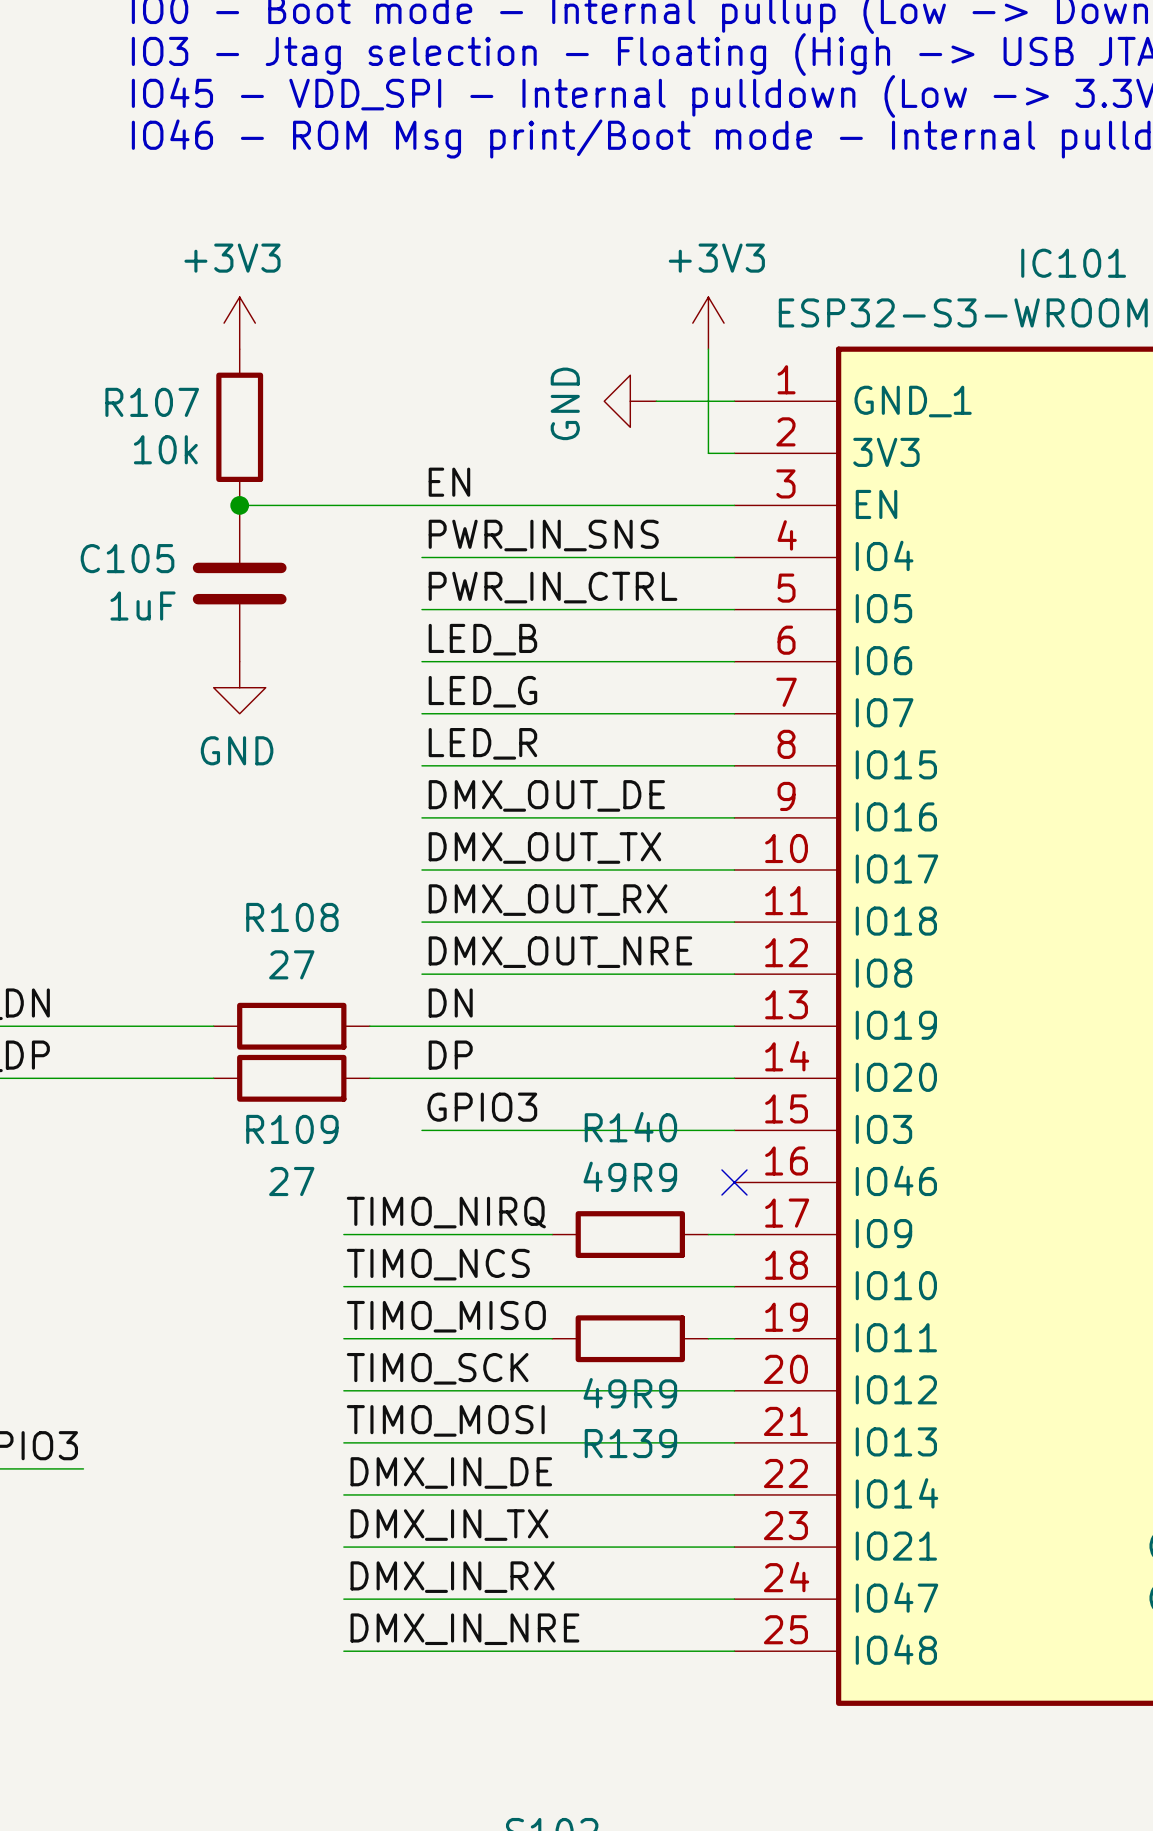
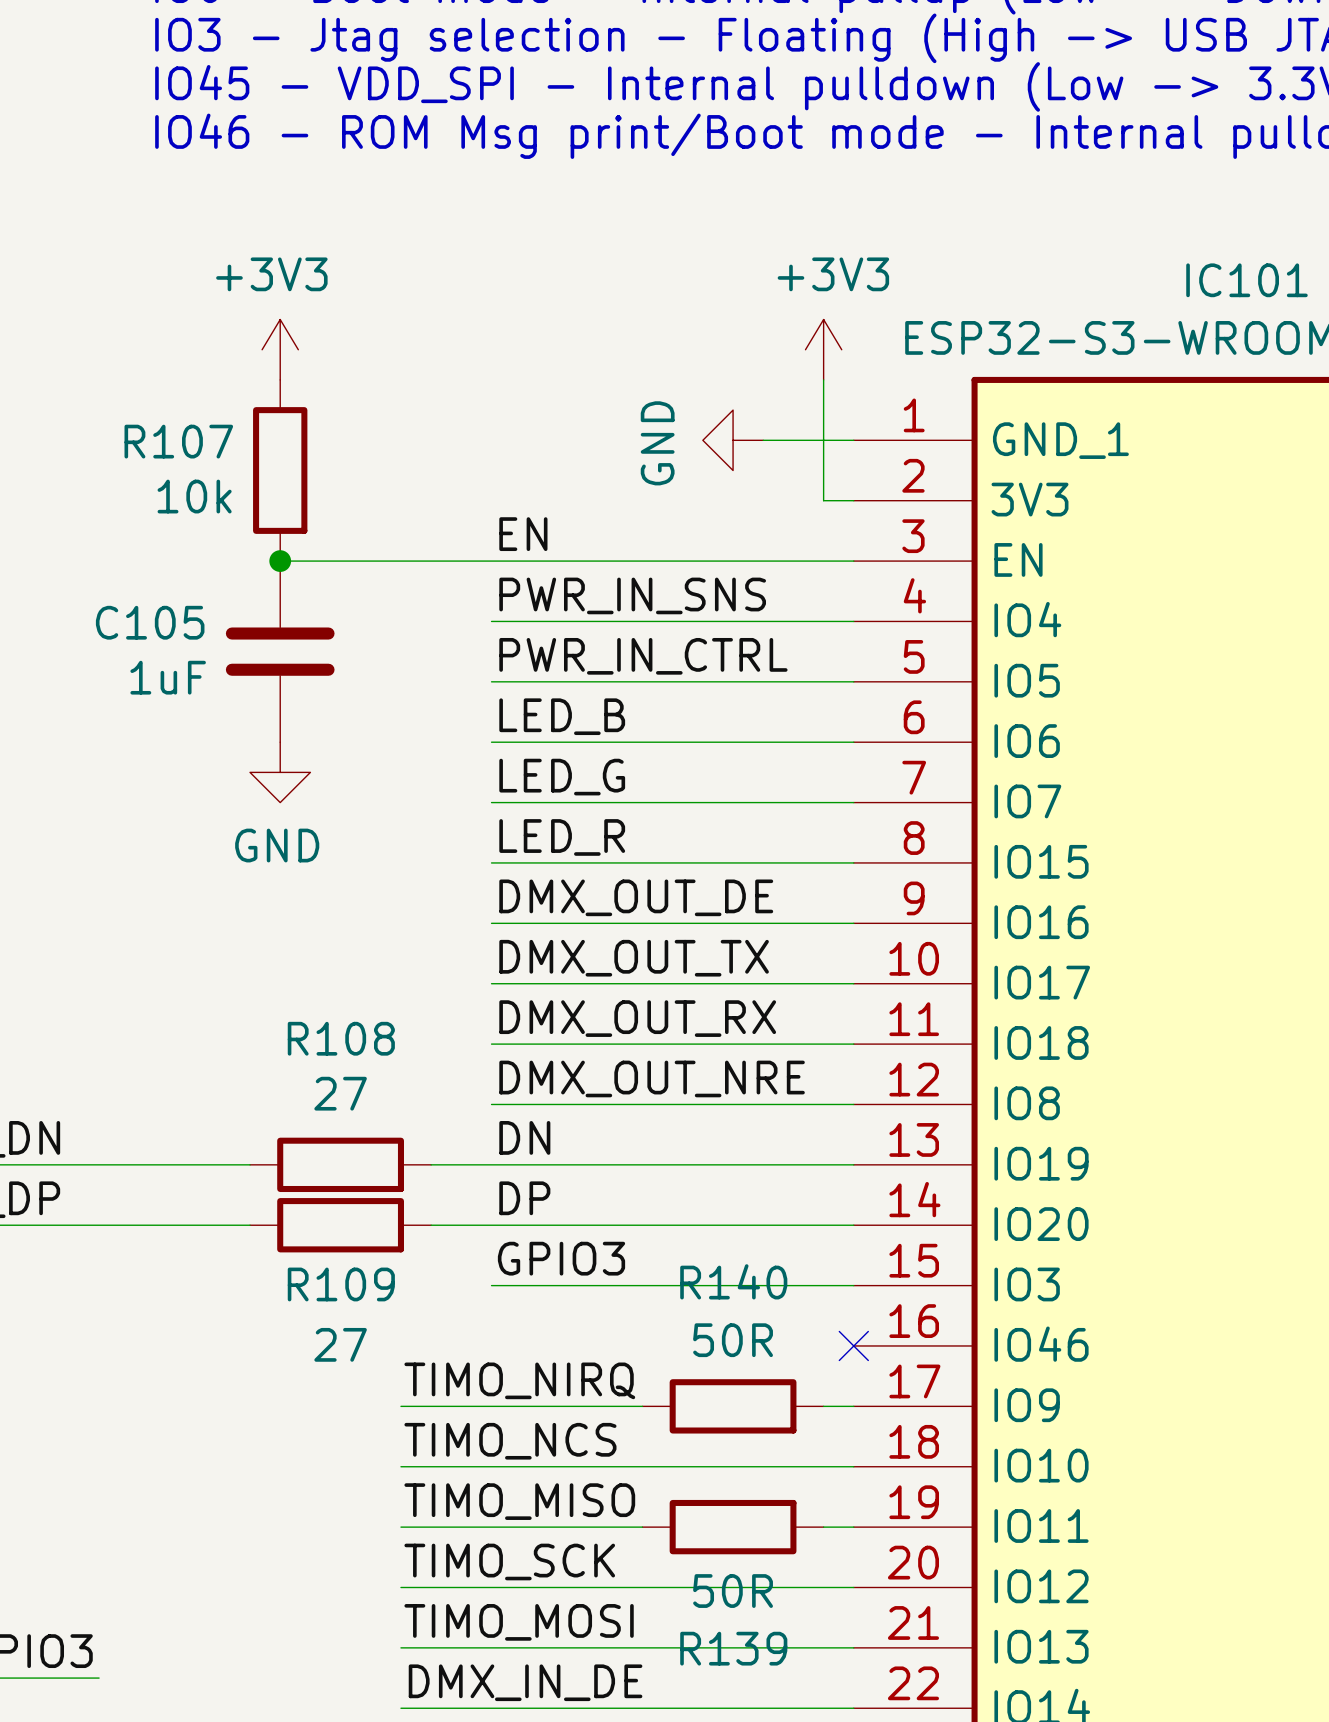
R140 value: 49R9 (630, 1176) -> 50R (733, 1340)
R139 value: 49R9 (630, 1393) -> 50R (733, 1591)

